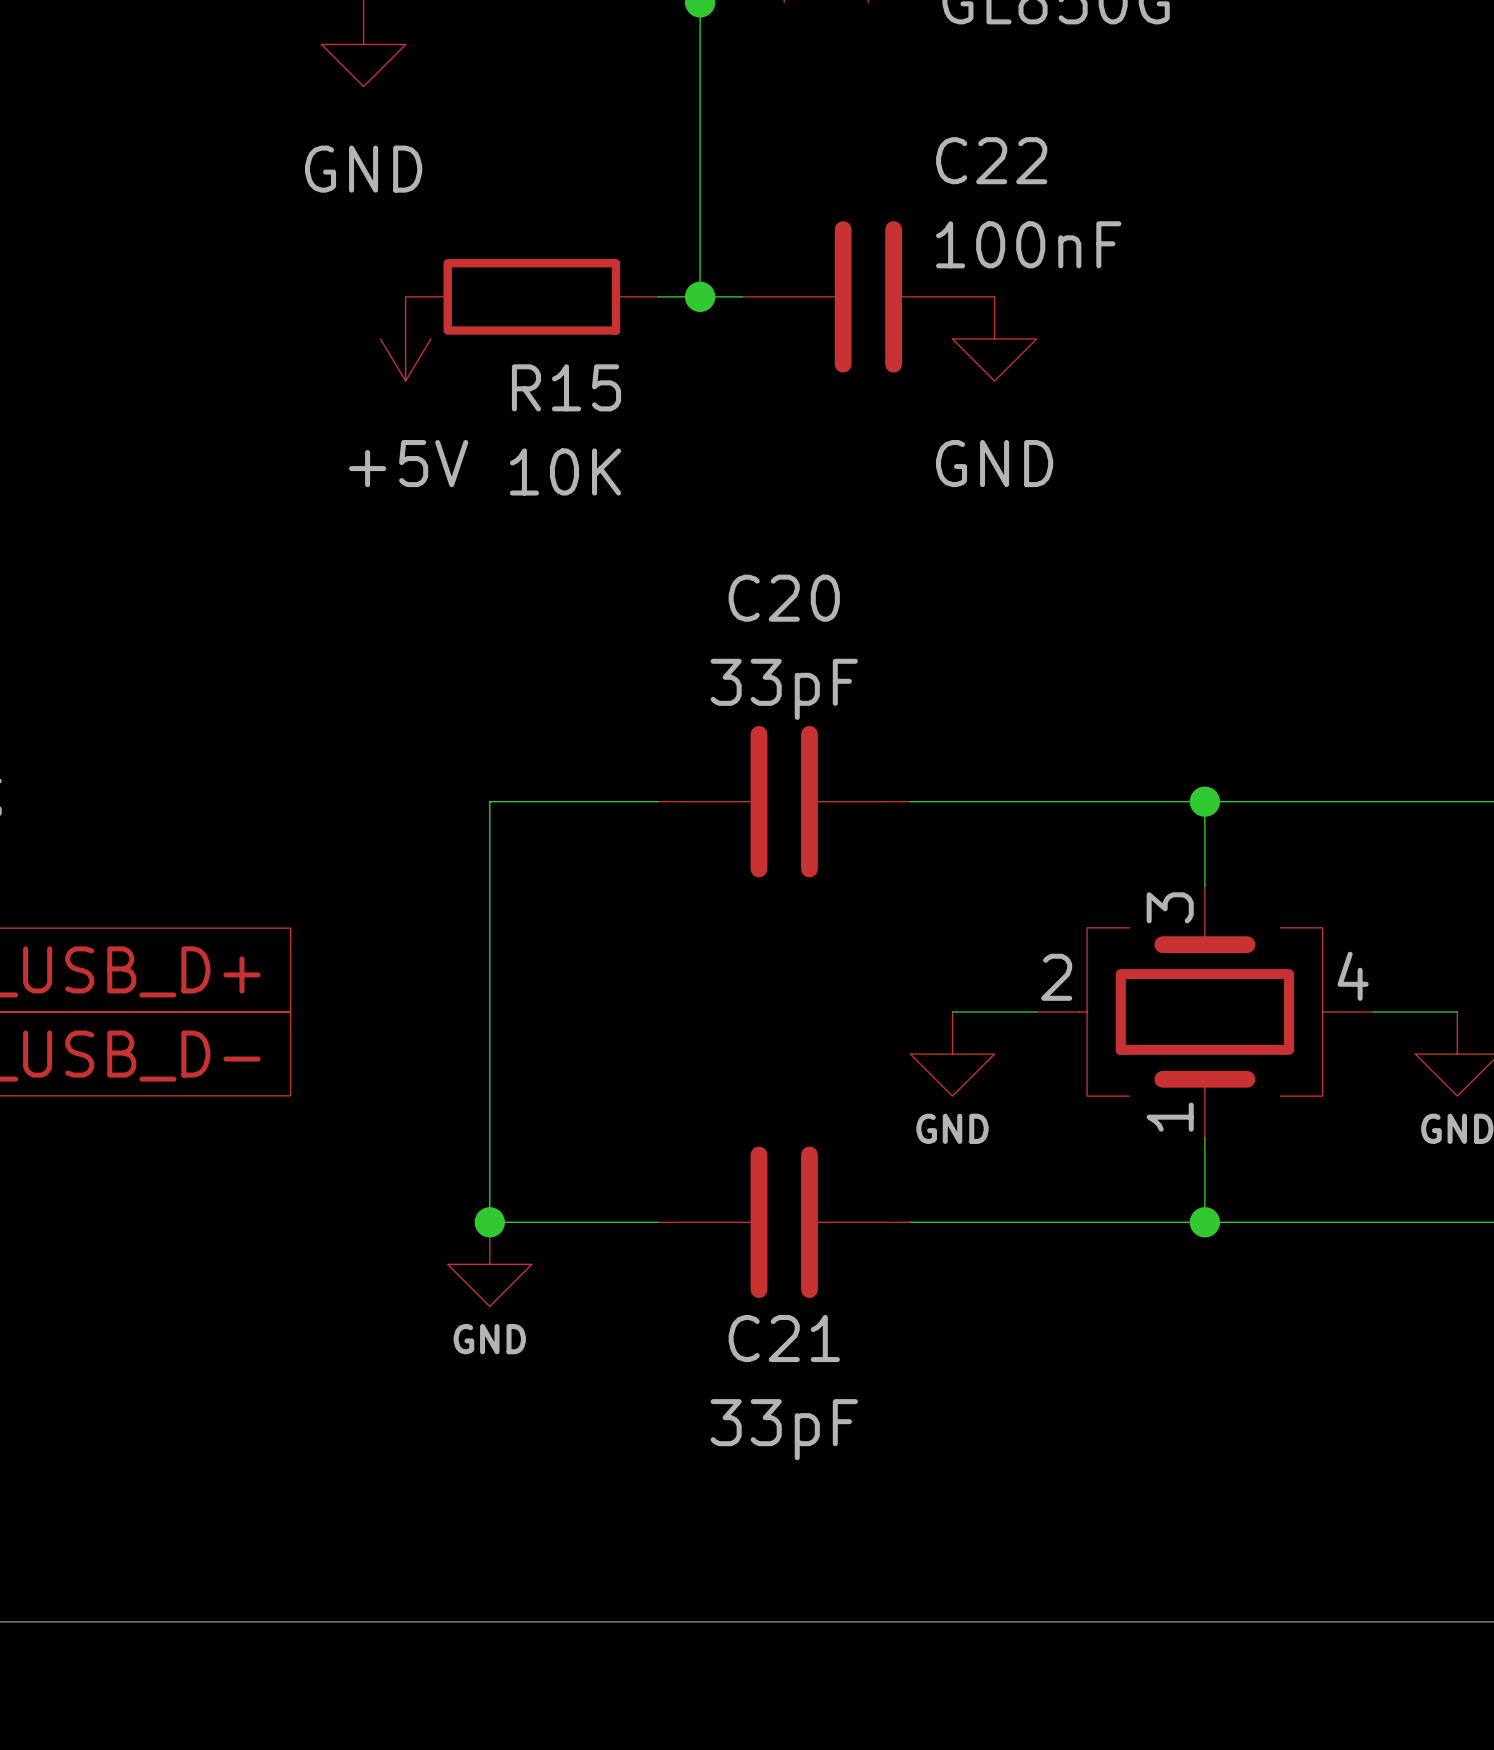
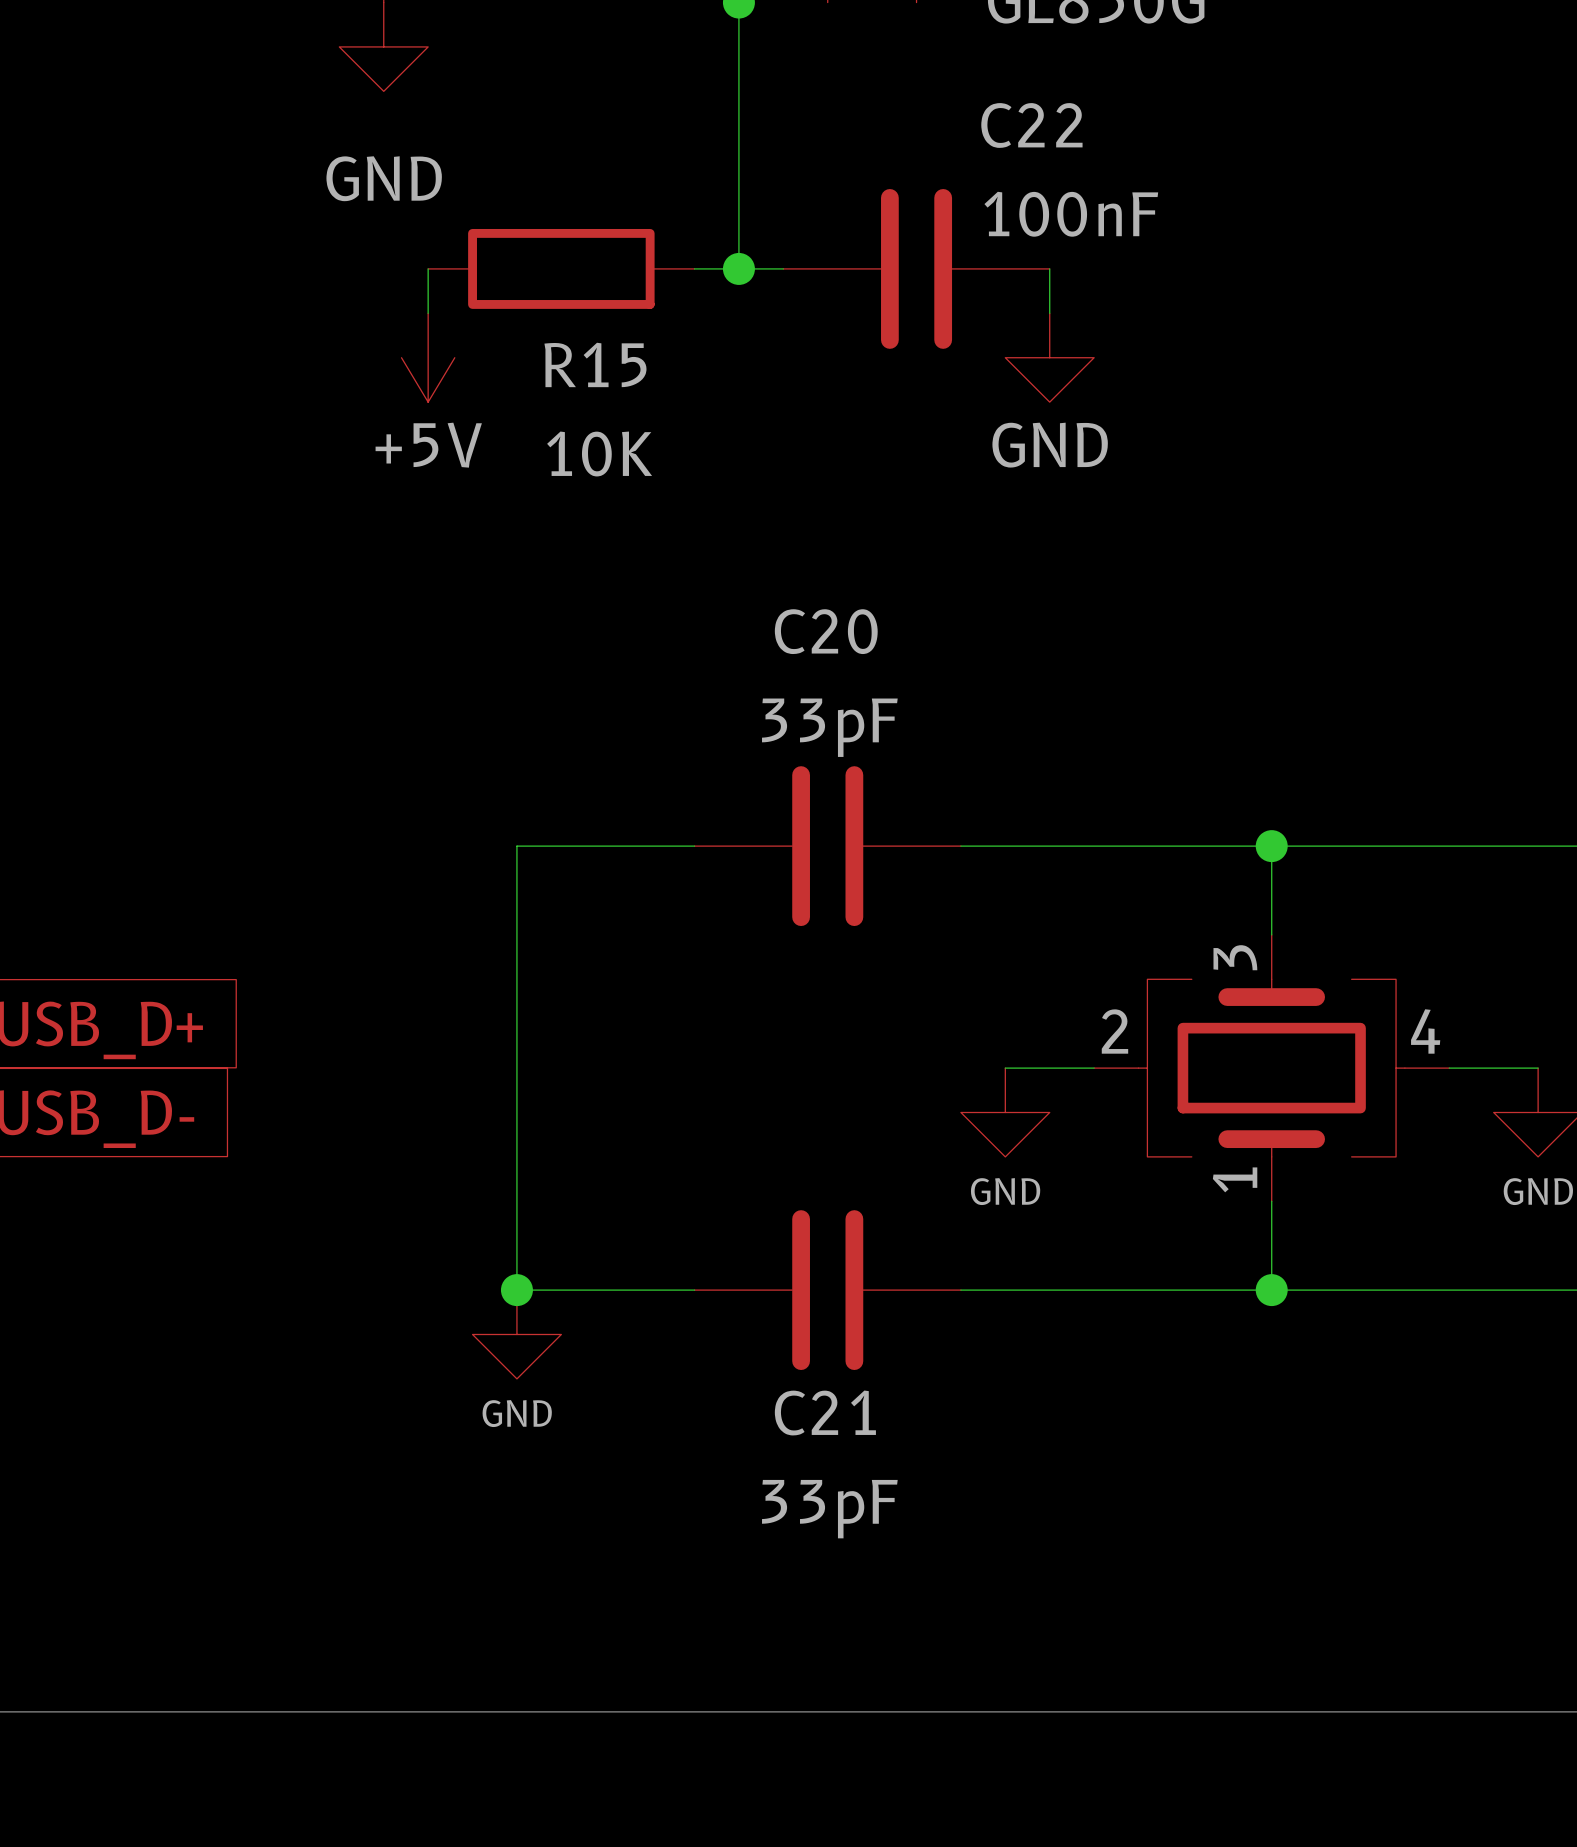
wire: none -> (428, 268) (428, 313)
wire: (700, 254) (700, 296) -> (1049, 268) (1049, 313)
R15 position: (531, 296) -> (561, 268)
wire: (658, 296) (742, 296) -> (694, 268) (783, 268)
junction position: (700, 296) -> (738, 268)
C22 position: (868, 296) -> (916, 268)
power symbol text position: +5V (408, 463) -> +5V (428, 445)
power symbol text position: GND (994, 463) -> GND (1050, 445)

